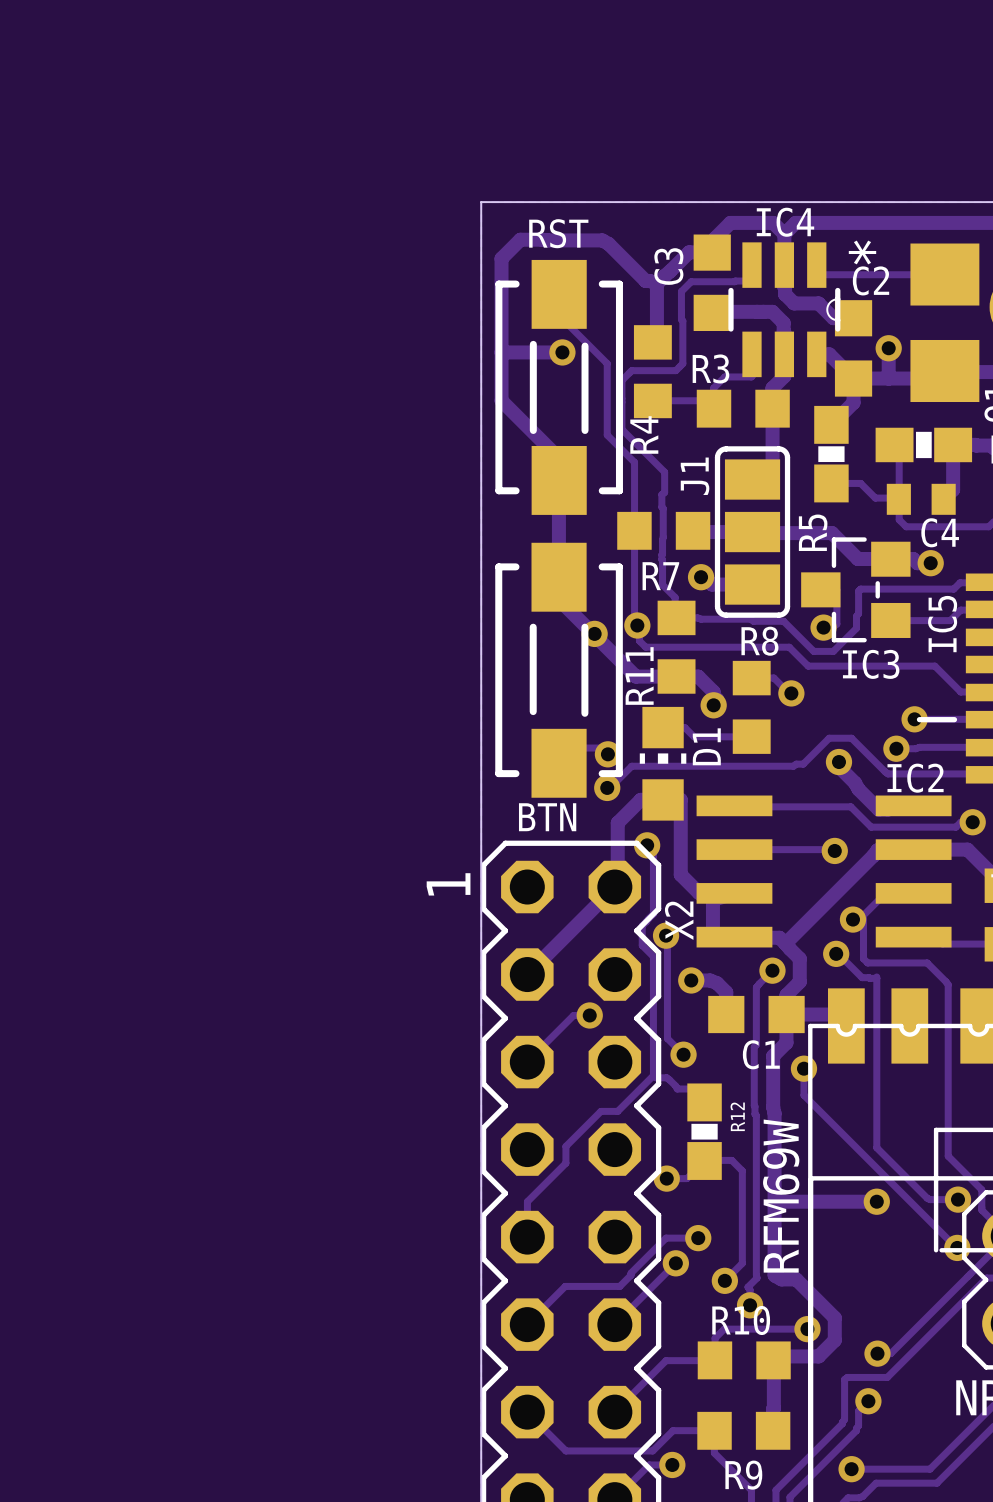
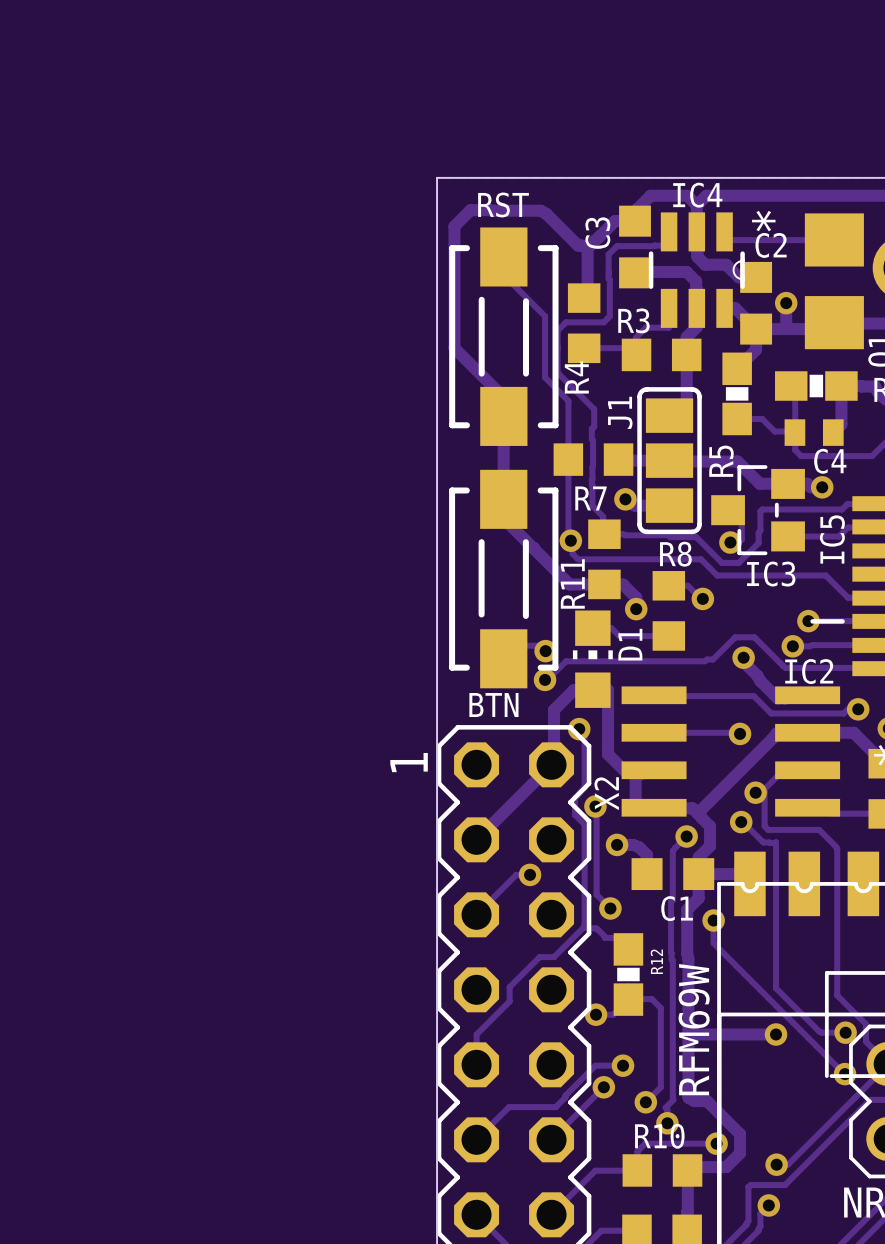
track: (501, 352) (562, 352) -> none
via: (562, 352) -> none
via: (594, 633) -> none

